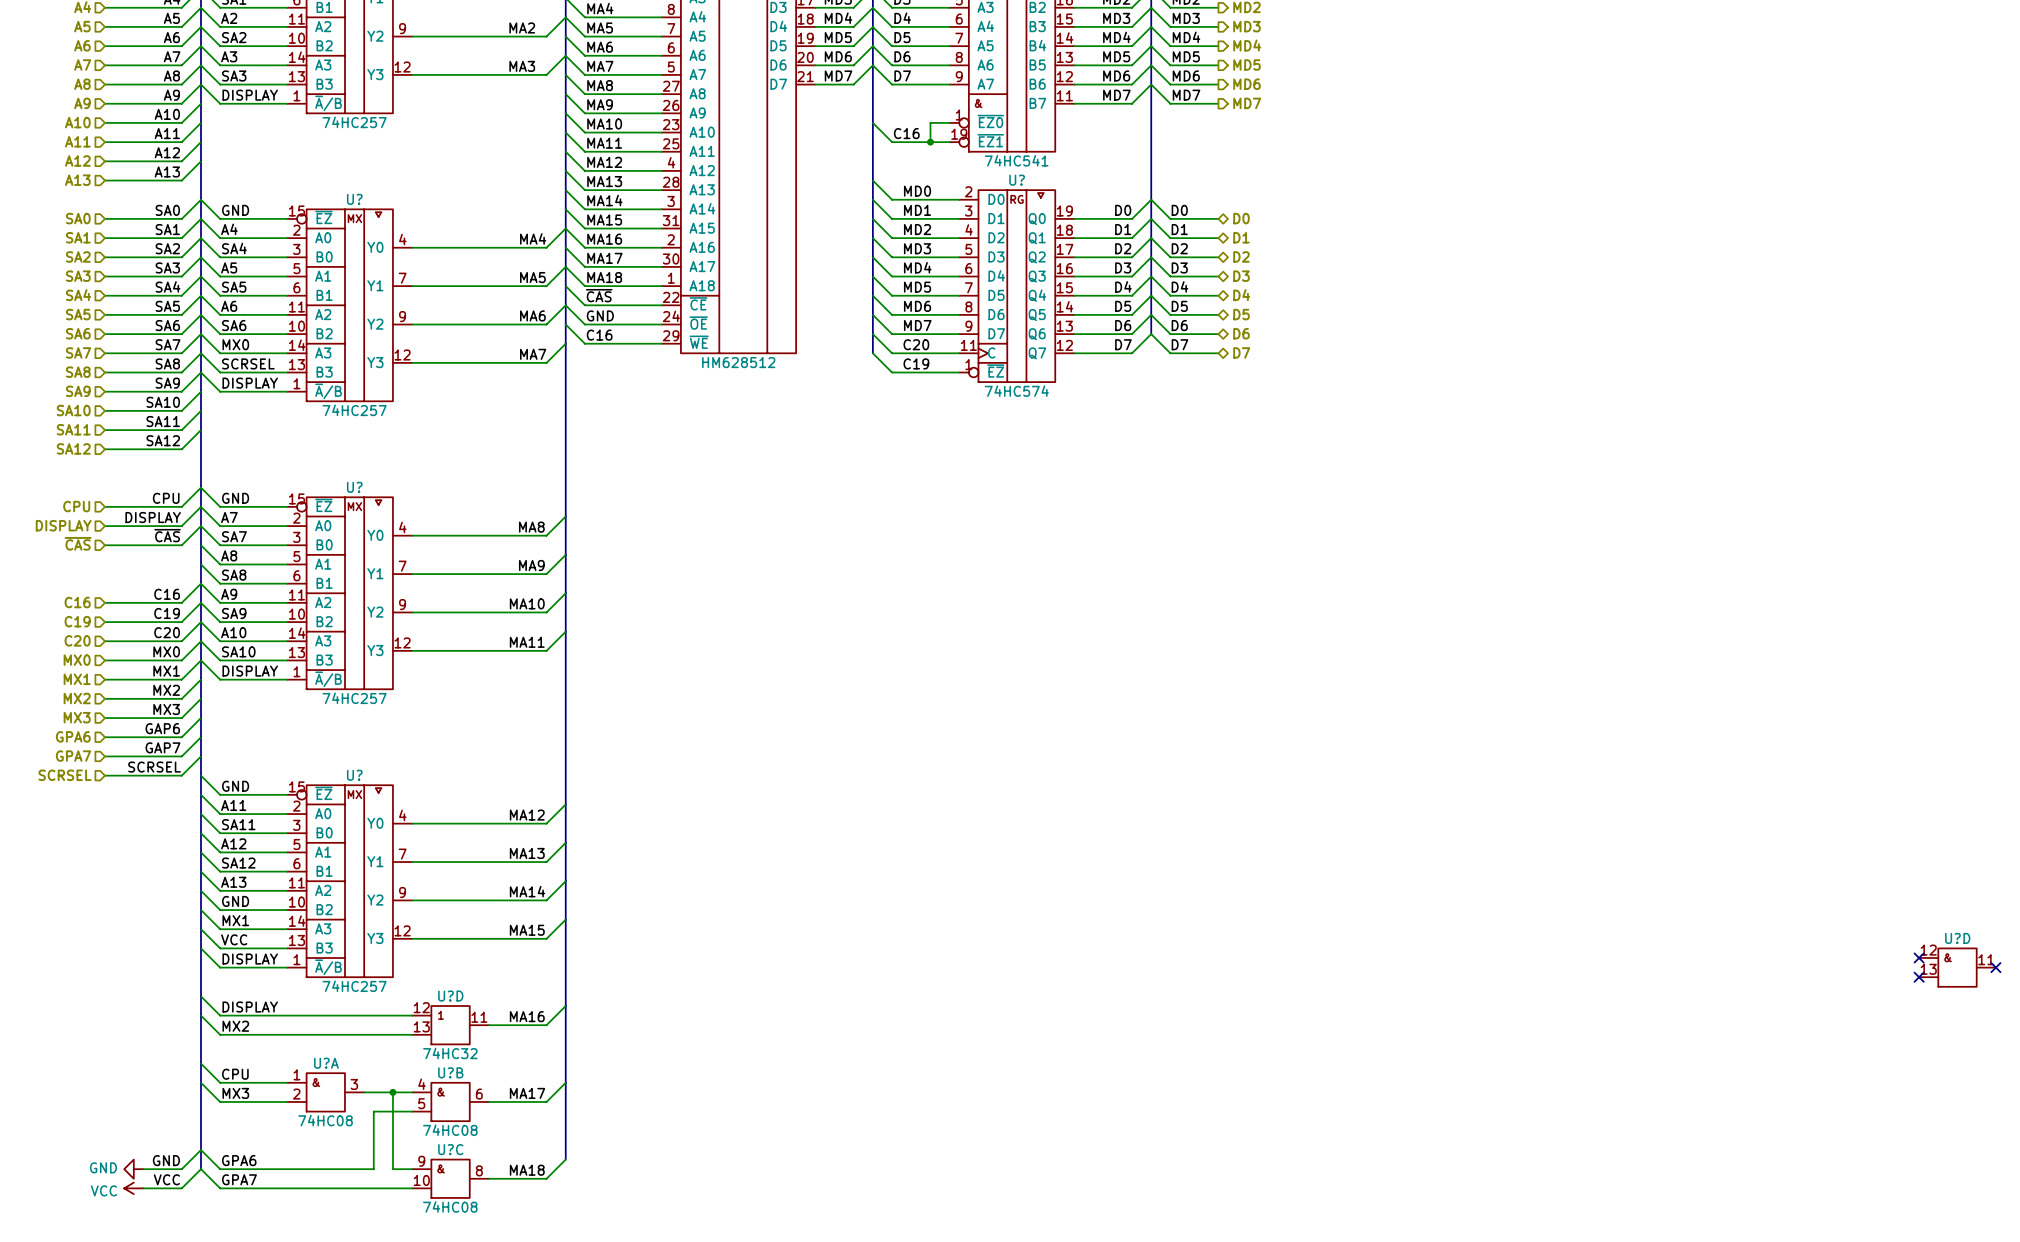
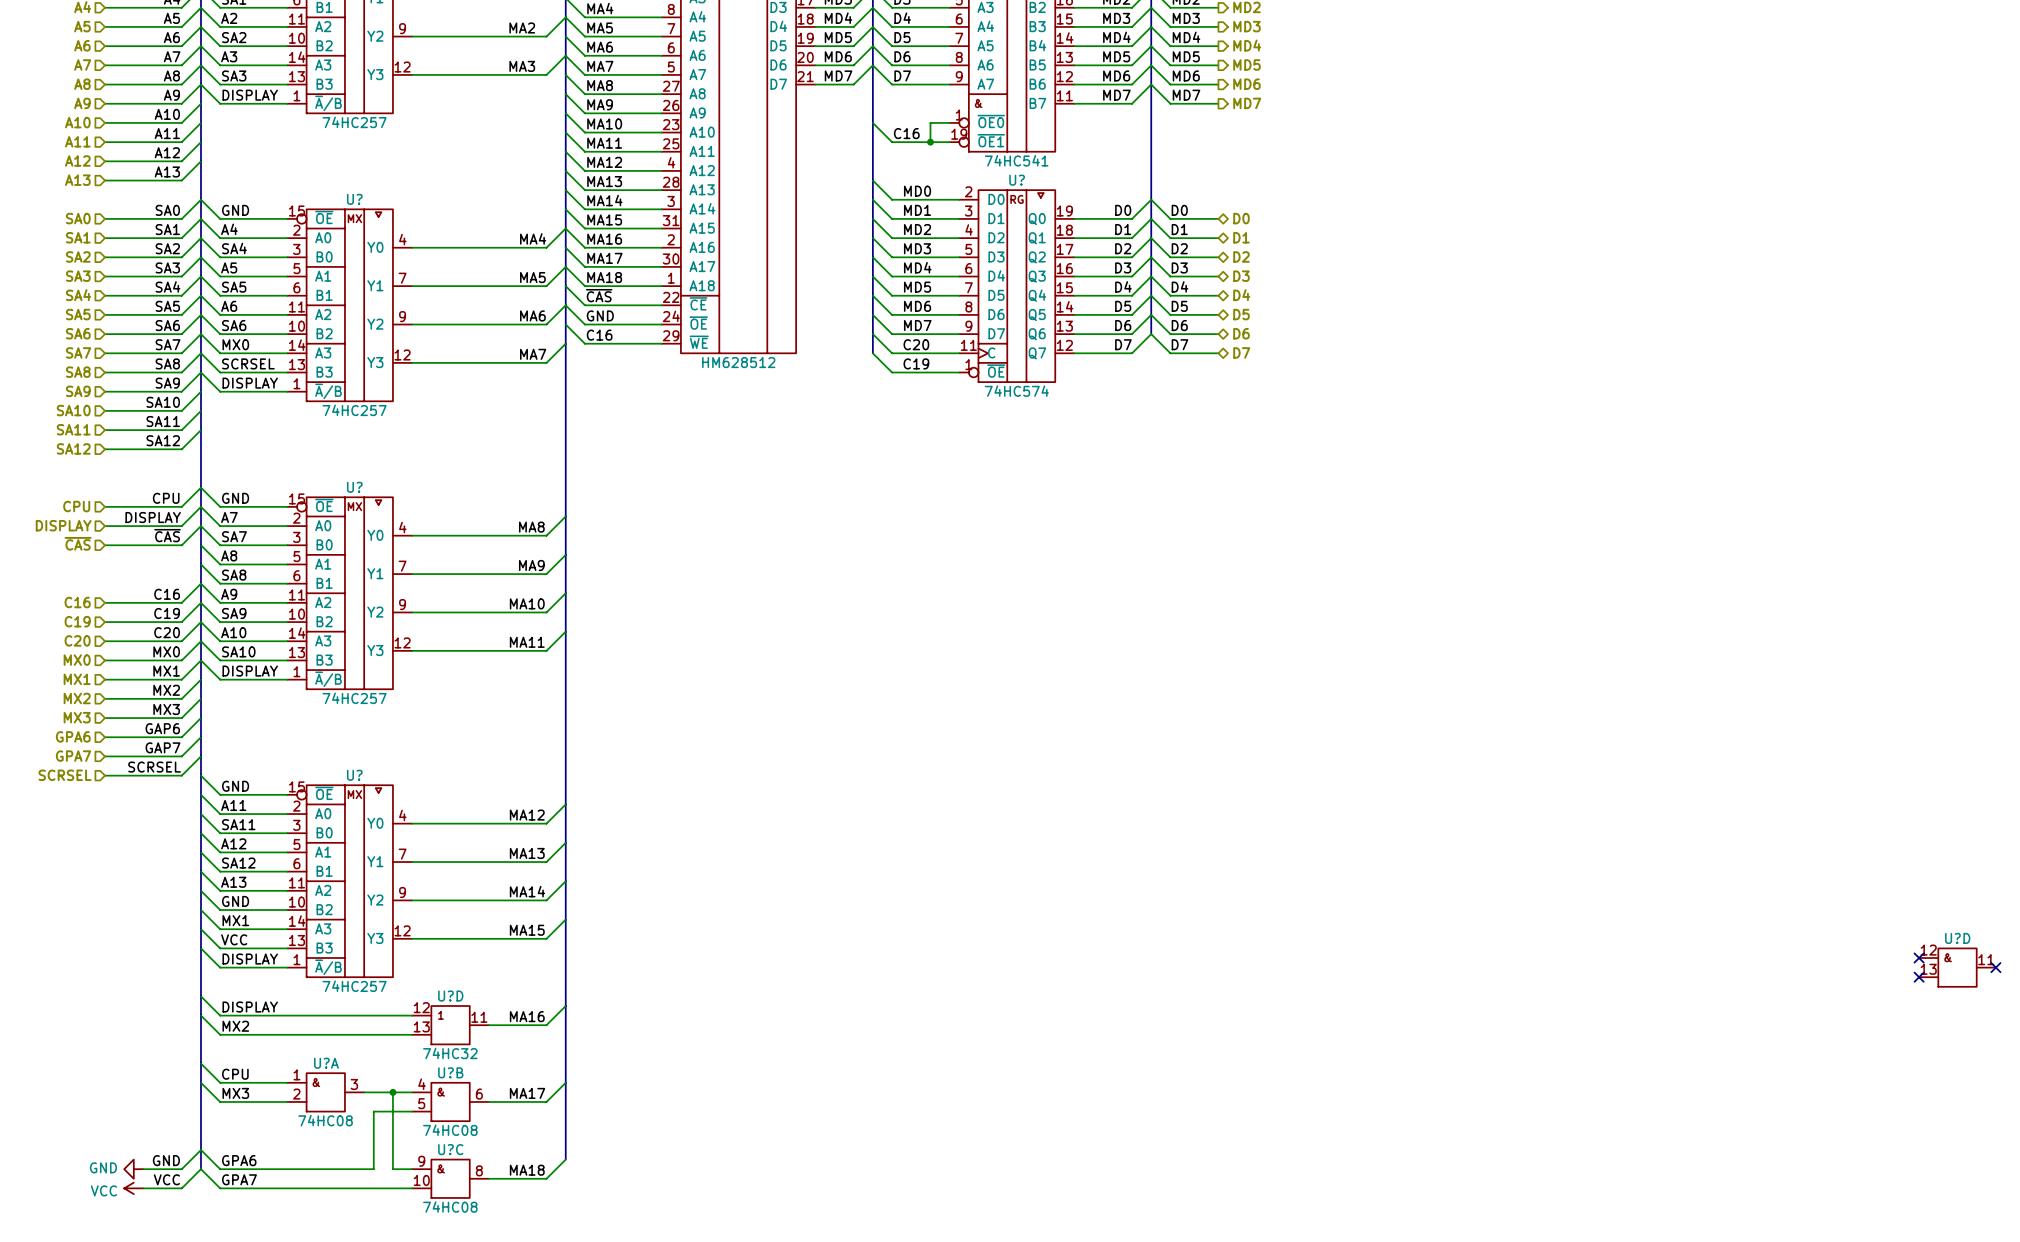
part pin name: ~{EZ0} (990, 121) -> ~{OE0} (991, 121)
part pin name: ~{EZ1} (990, 140) -> ~{OE1} (991, 140)
U? pin name: ~{EZ} (323, 217) -> ~{OE} (324, 217)
U? pin name: ~{EZ} (995, 371) -> ~{OE} (996, 371)
U? pin name: ~{EZ} (323, 505) -> ~{OE} (324, 505)
U? pin name: ~{EZ} (323, 793) -> ~{OE} (324, 793)

